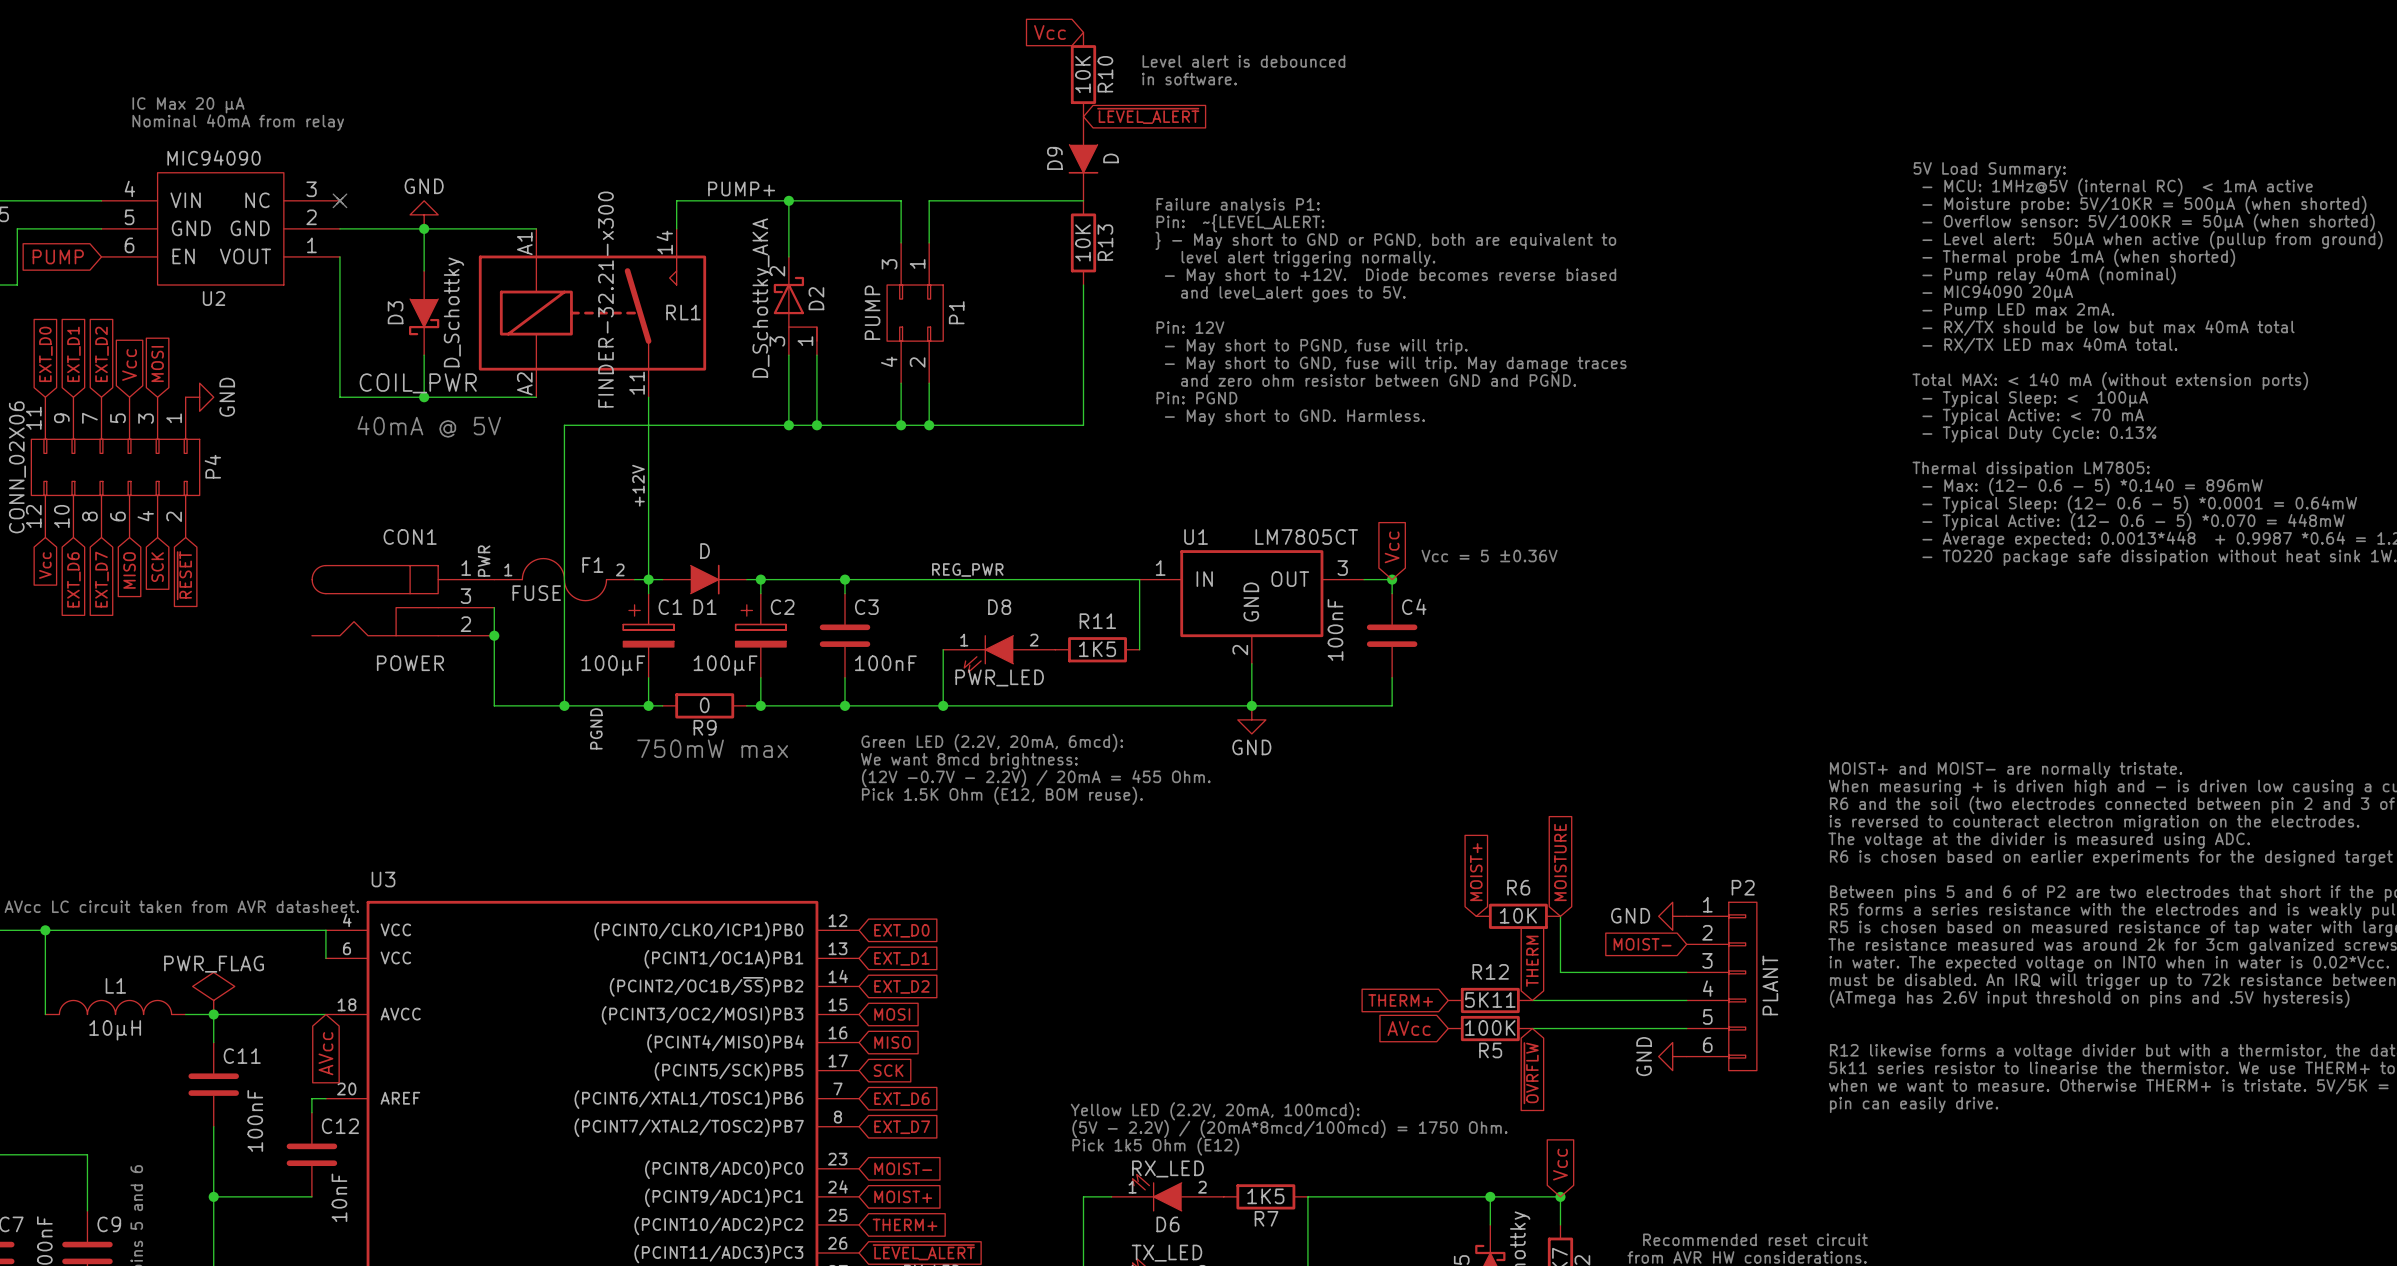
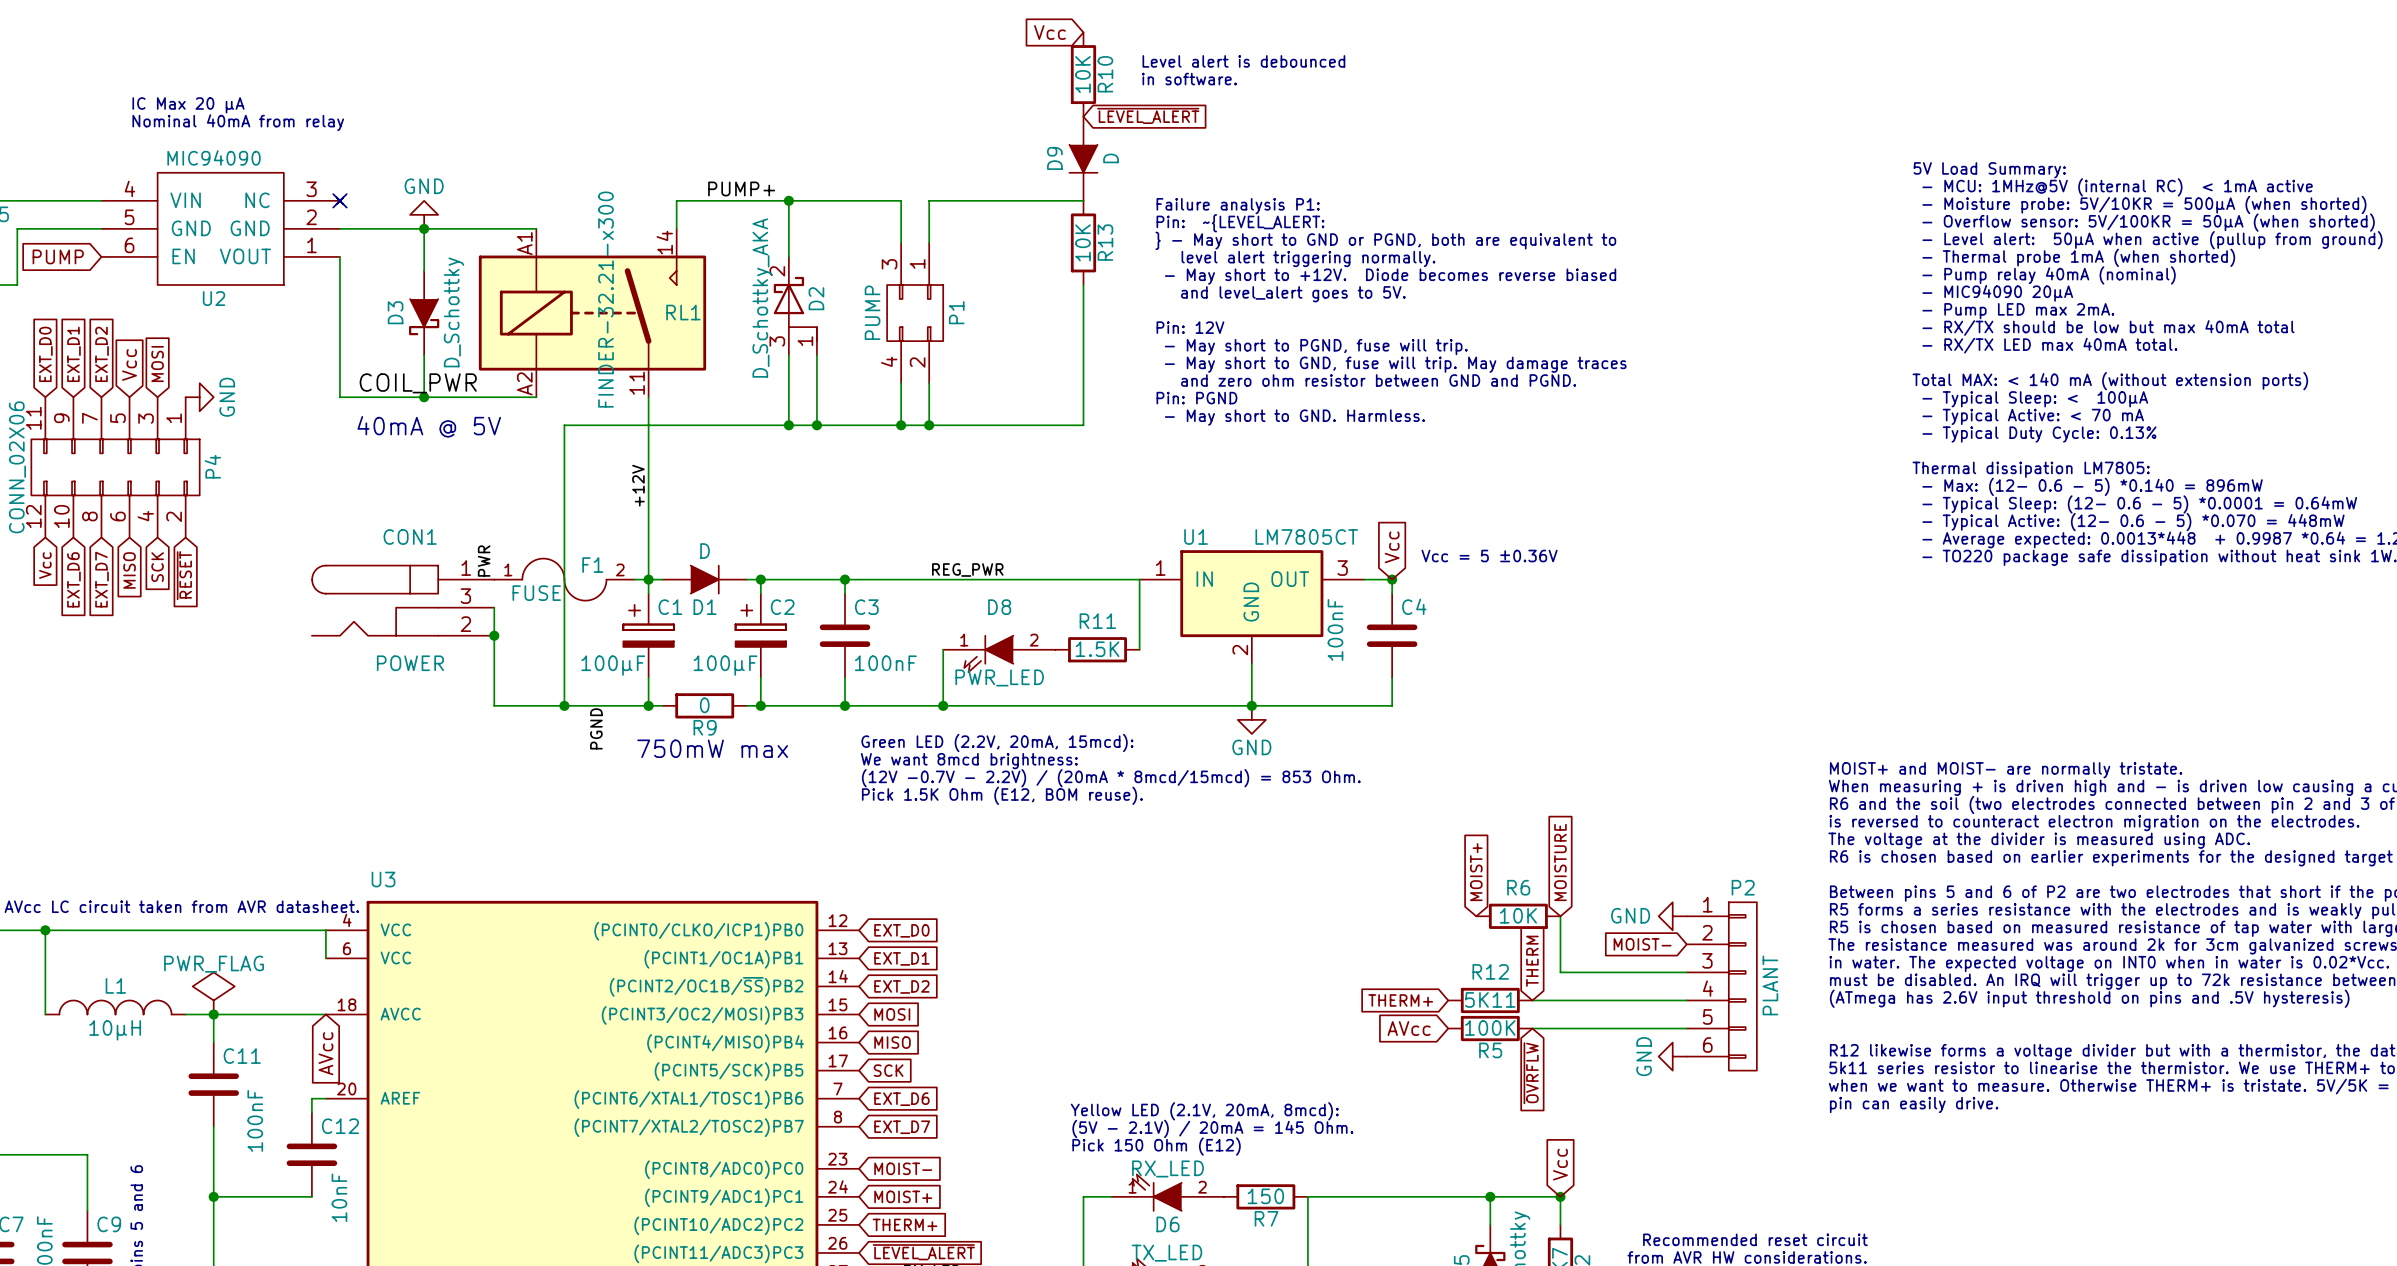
R11 value: 1K5 (1097, 649) -> 1.5K (1097, 649)
text: Green LED (2.2V, 20mA, 6mcd): (992, 742) -> Green LED (2.2V, 20mA, 15mcd): (997, 742)
text: (12V -0.7V - 2.2V) / 20mA = 455 Ohm. (1036, 778) -> (12V -0.7V - 2.2V) / (20mA * 8mcd/15mcd) = 853 Ohm. (1111, 778)
text: Yellow LED (2.2V, 20mA, 100mcd): (1215, 1111) -> Yellow LED (2.1V, 20mA, 8mcd): (1204, 1111)
text: (5V - 2.2V) / (20mA*8mcd/100mcd) = 1750 Ohm. (1289, 1128) -> (5V - 2.1V) / 20mA = 145 Ohm. (1212, 1128)
text: Pick 1k5 Ohm (E12) (1155, 1146) -> Pick 150 Ohm (E12) (1156, 1146)
R7 value: 1K5 (1265, 1196) -> 150 (1265, 1196)

